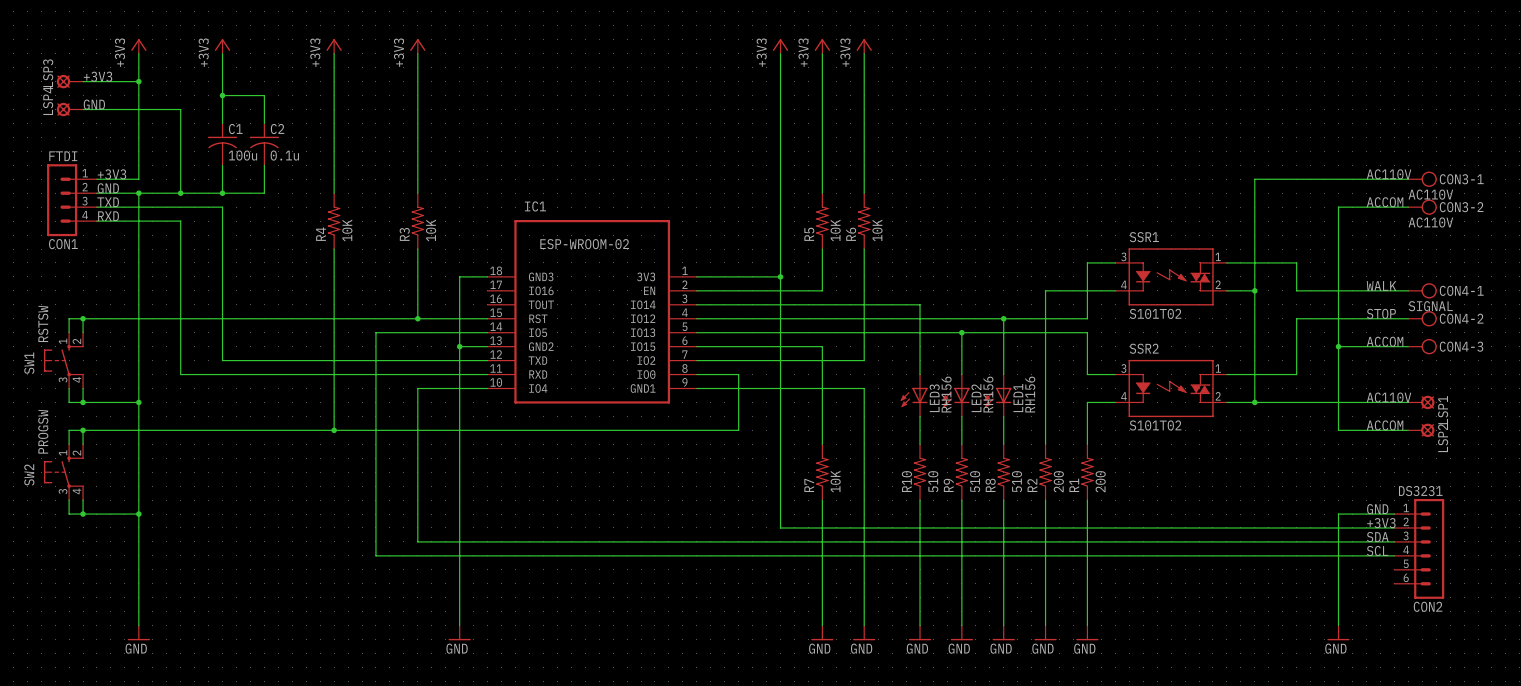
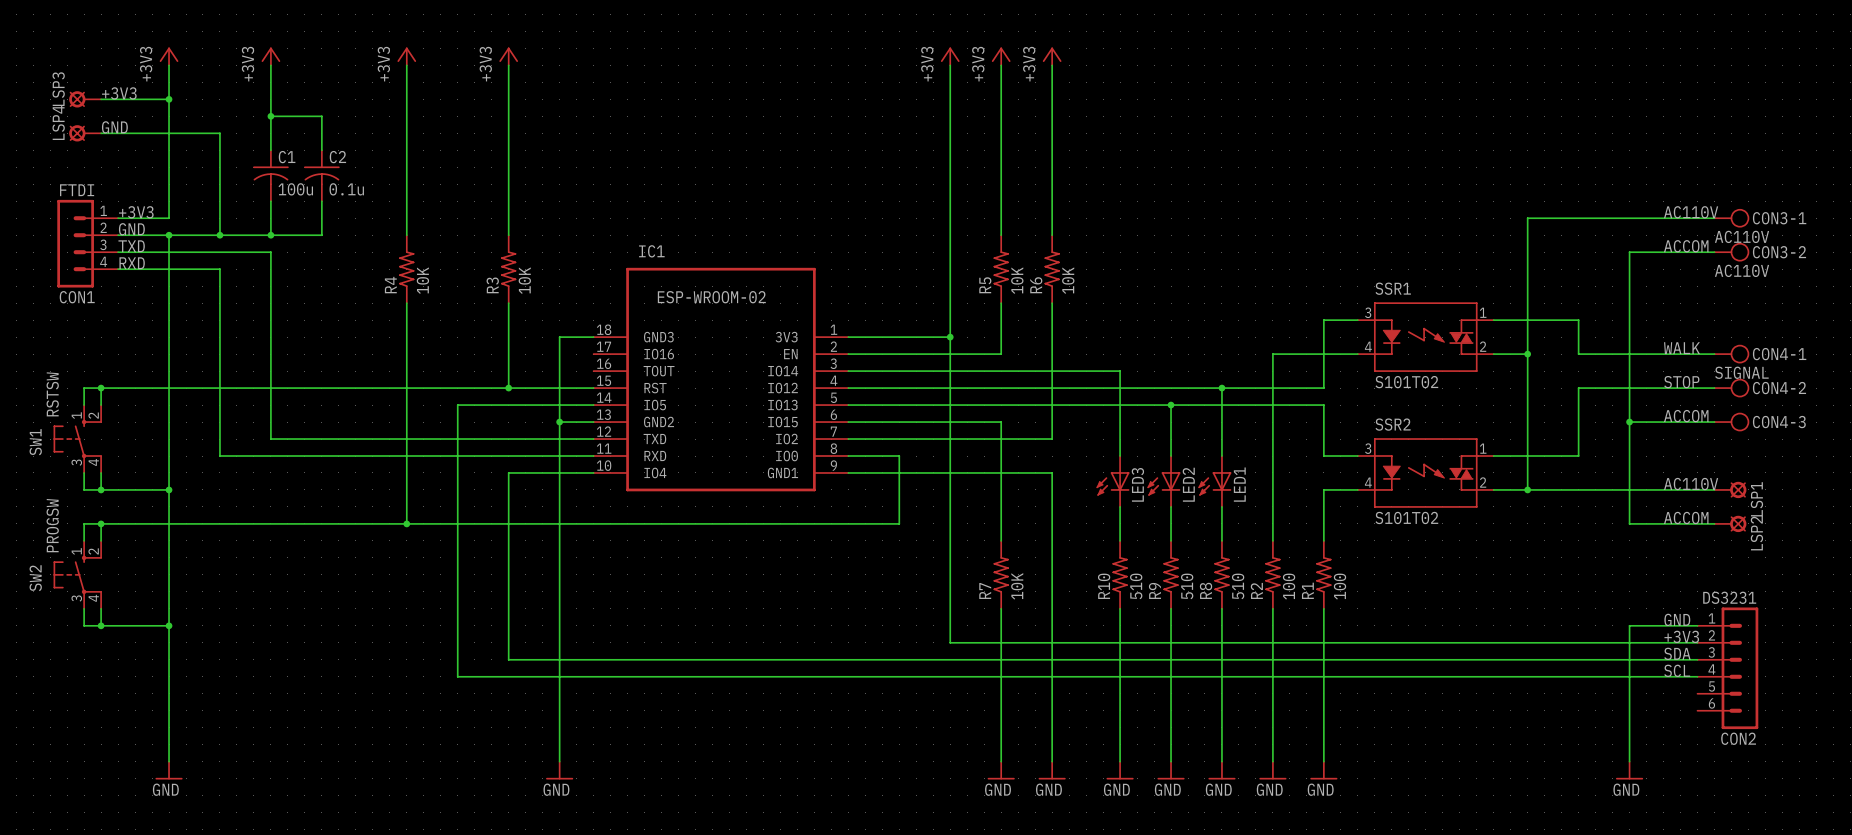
LED3 value: RH156 (946, 394) -> none
LED2 value: RH156 (988, 394) -> none
LED1 value: RH156 (1030, 394) -> none
R2 value: 200 (1058, 481) -> 100 (1289, 586)
R1 value: 200 (1100, 481) -> 100 (1340, 586)

